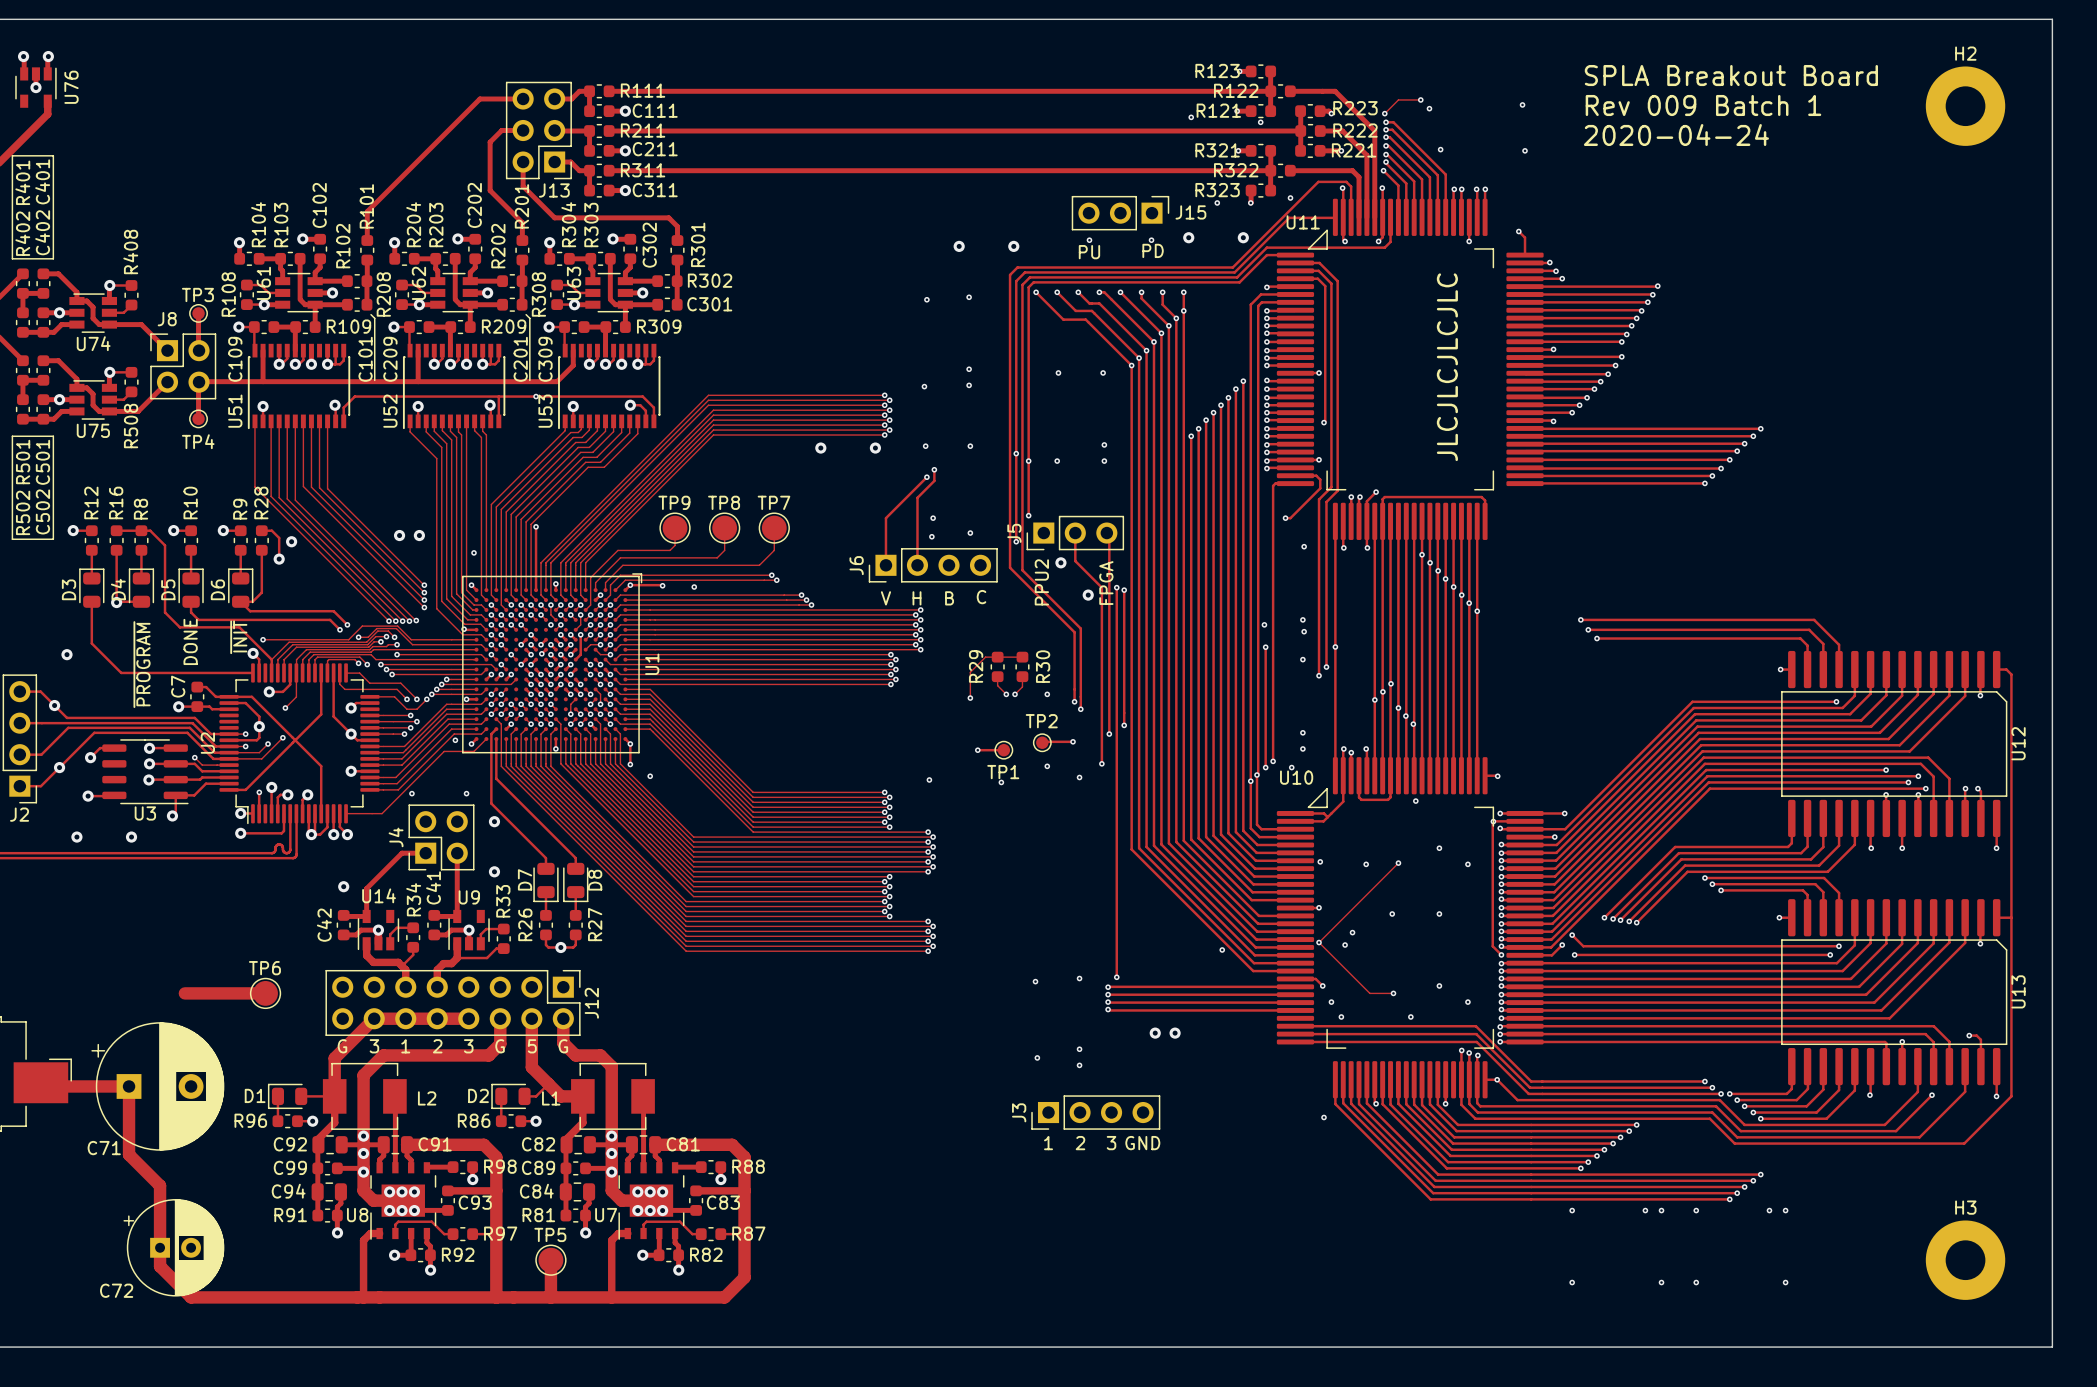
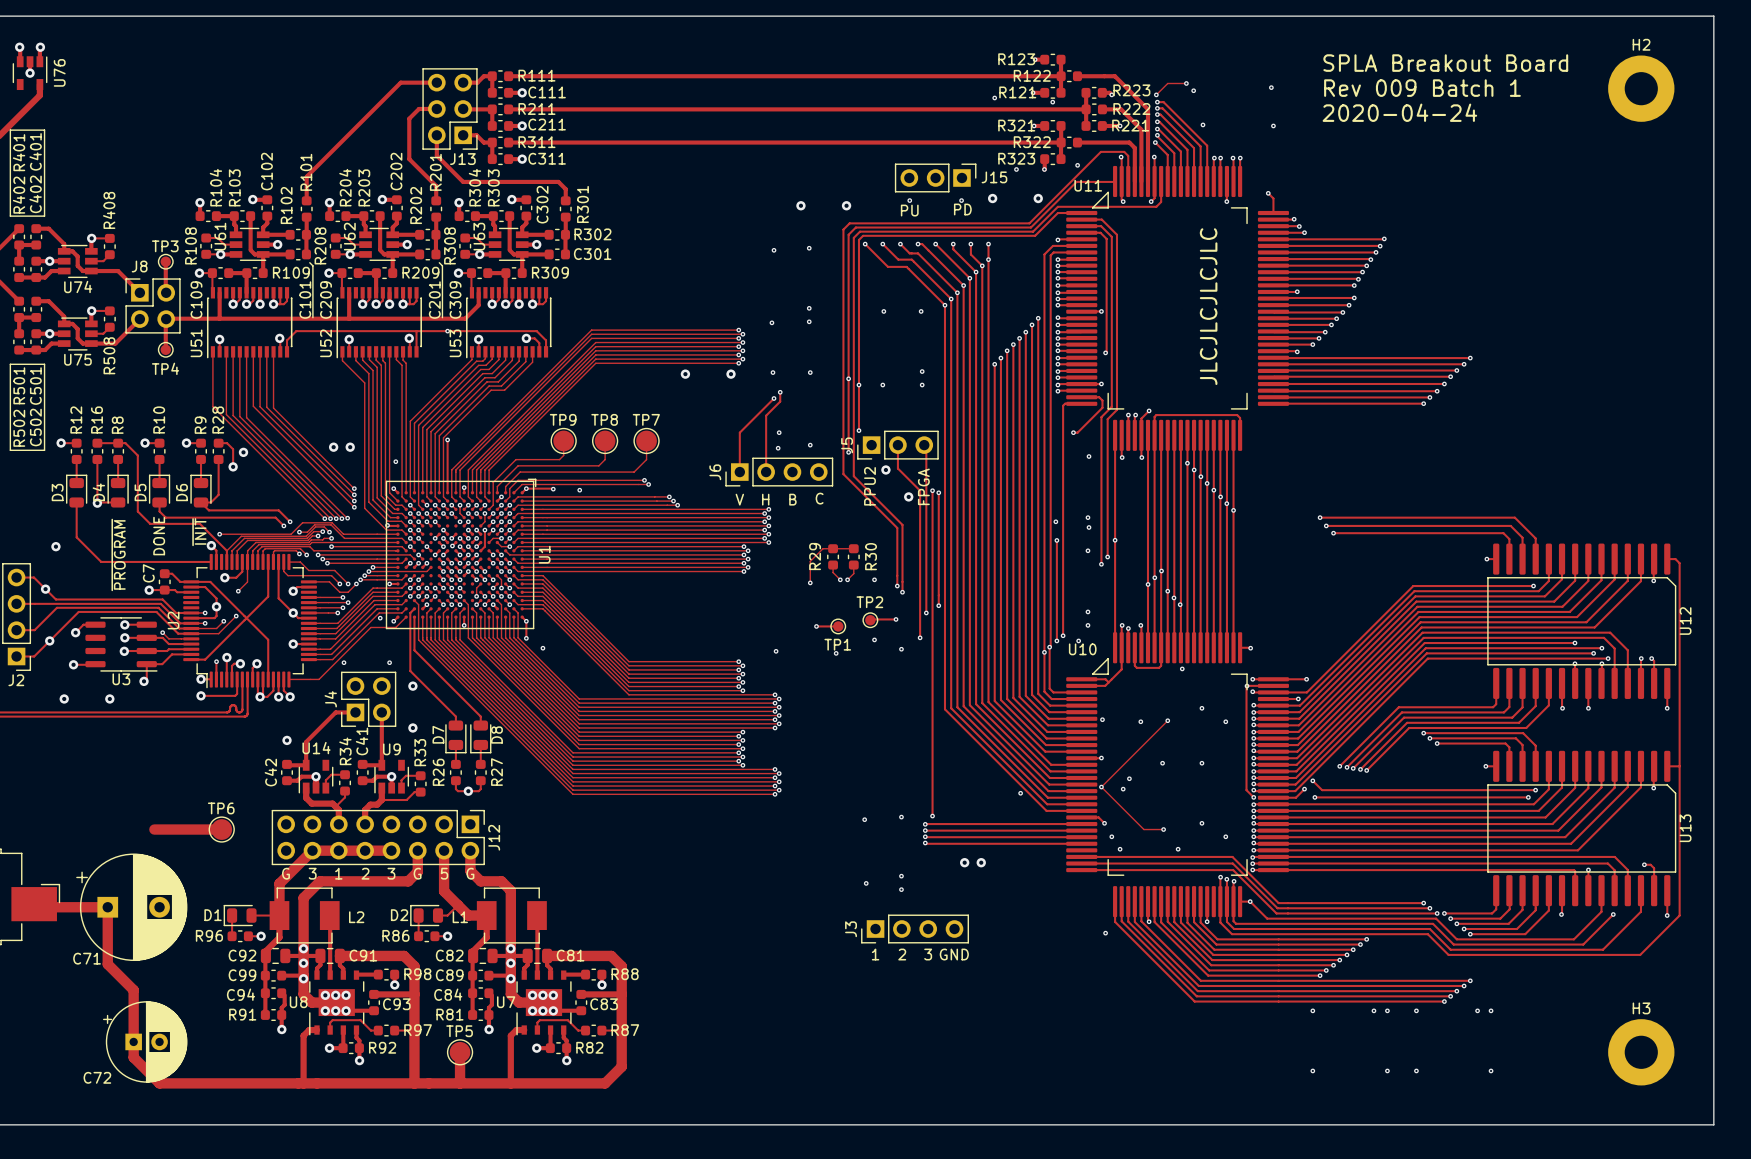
C94 footprint: [311, 1182, 347, 1202] -> [260, 987, 287, 1000]
C84 footprint: [559, 1182, 596, 1202] -> [468, 987, 494, 1000]
U8 name position: U8 (357, 1215) -> U8 (298, 1002)
U7 name position: U7 (606, 1215) -> U7 (506, 1002)

